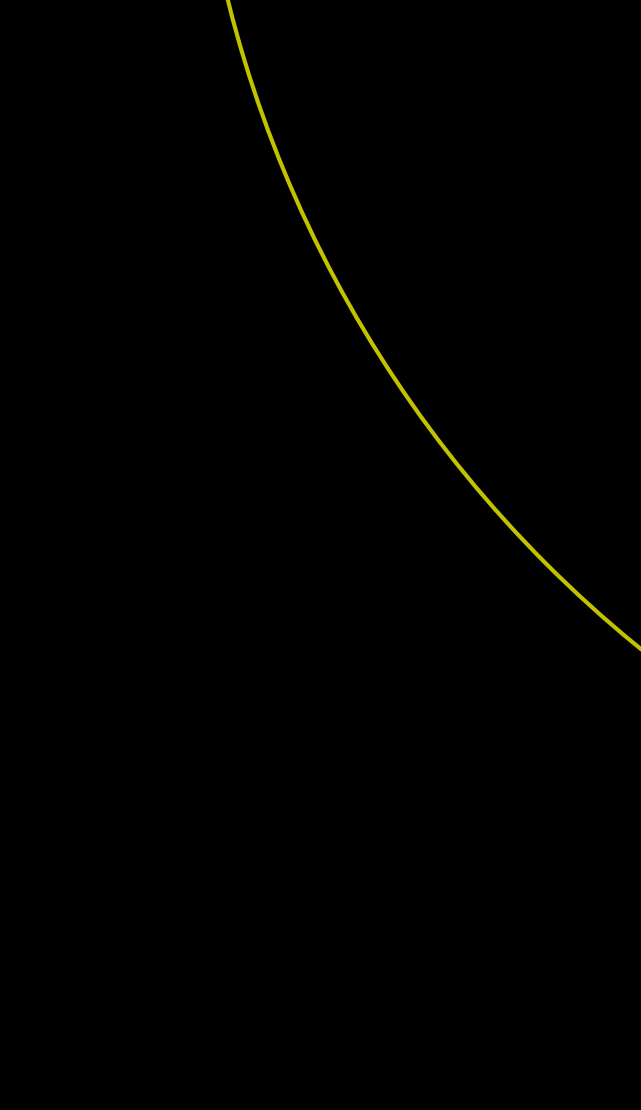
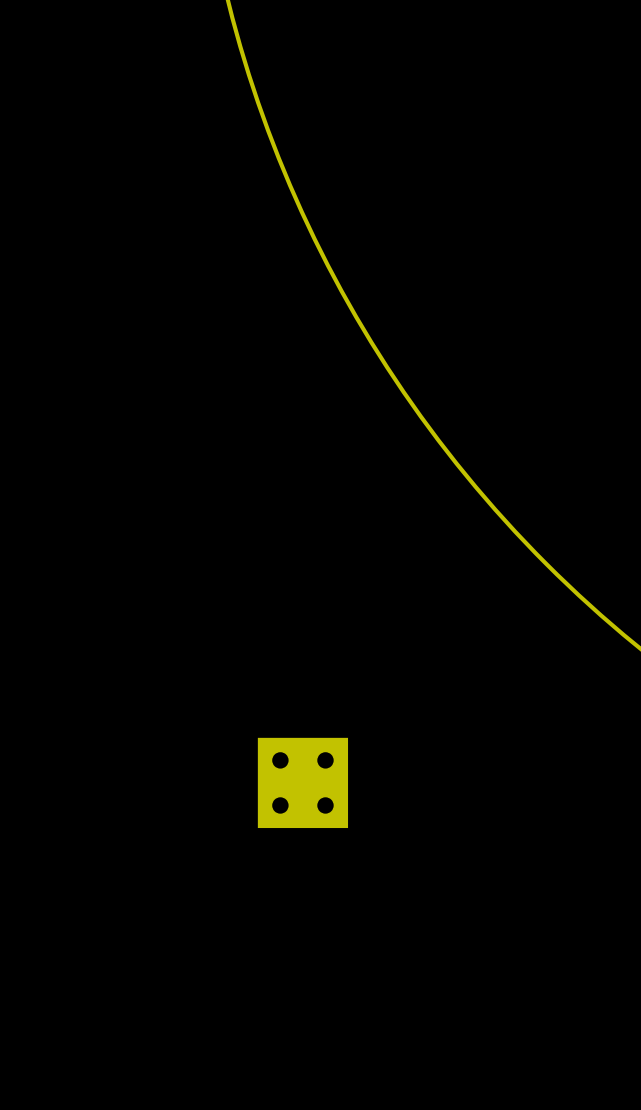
part: none -> (302, 782)

